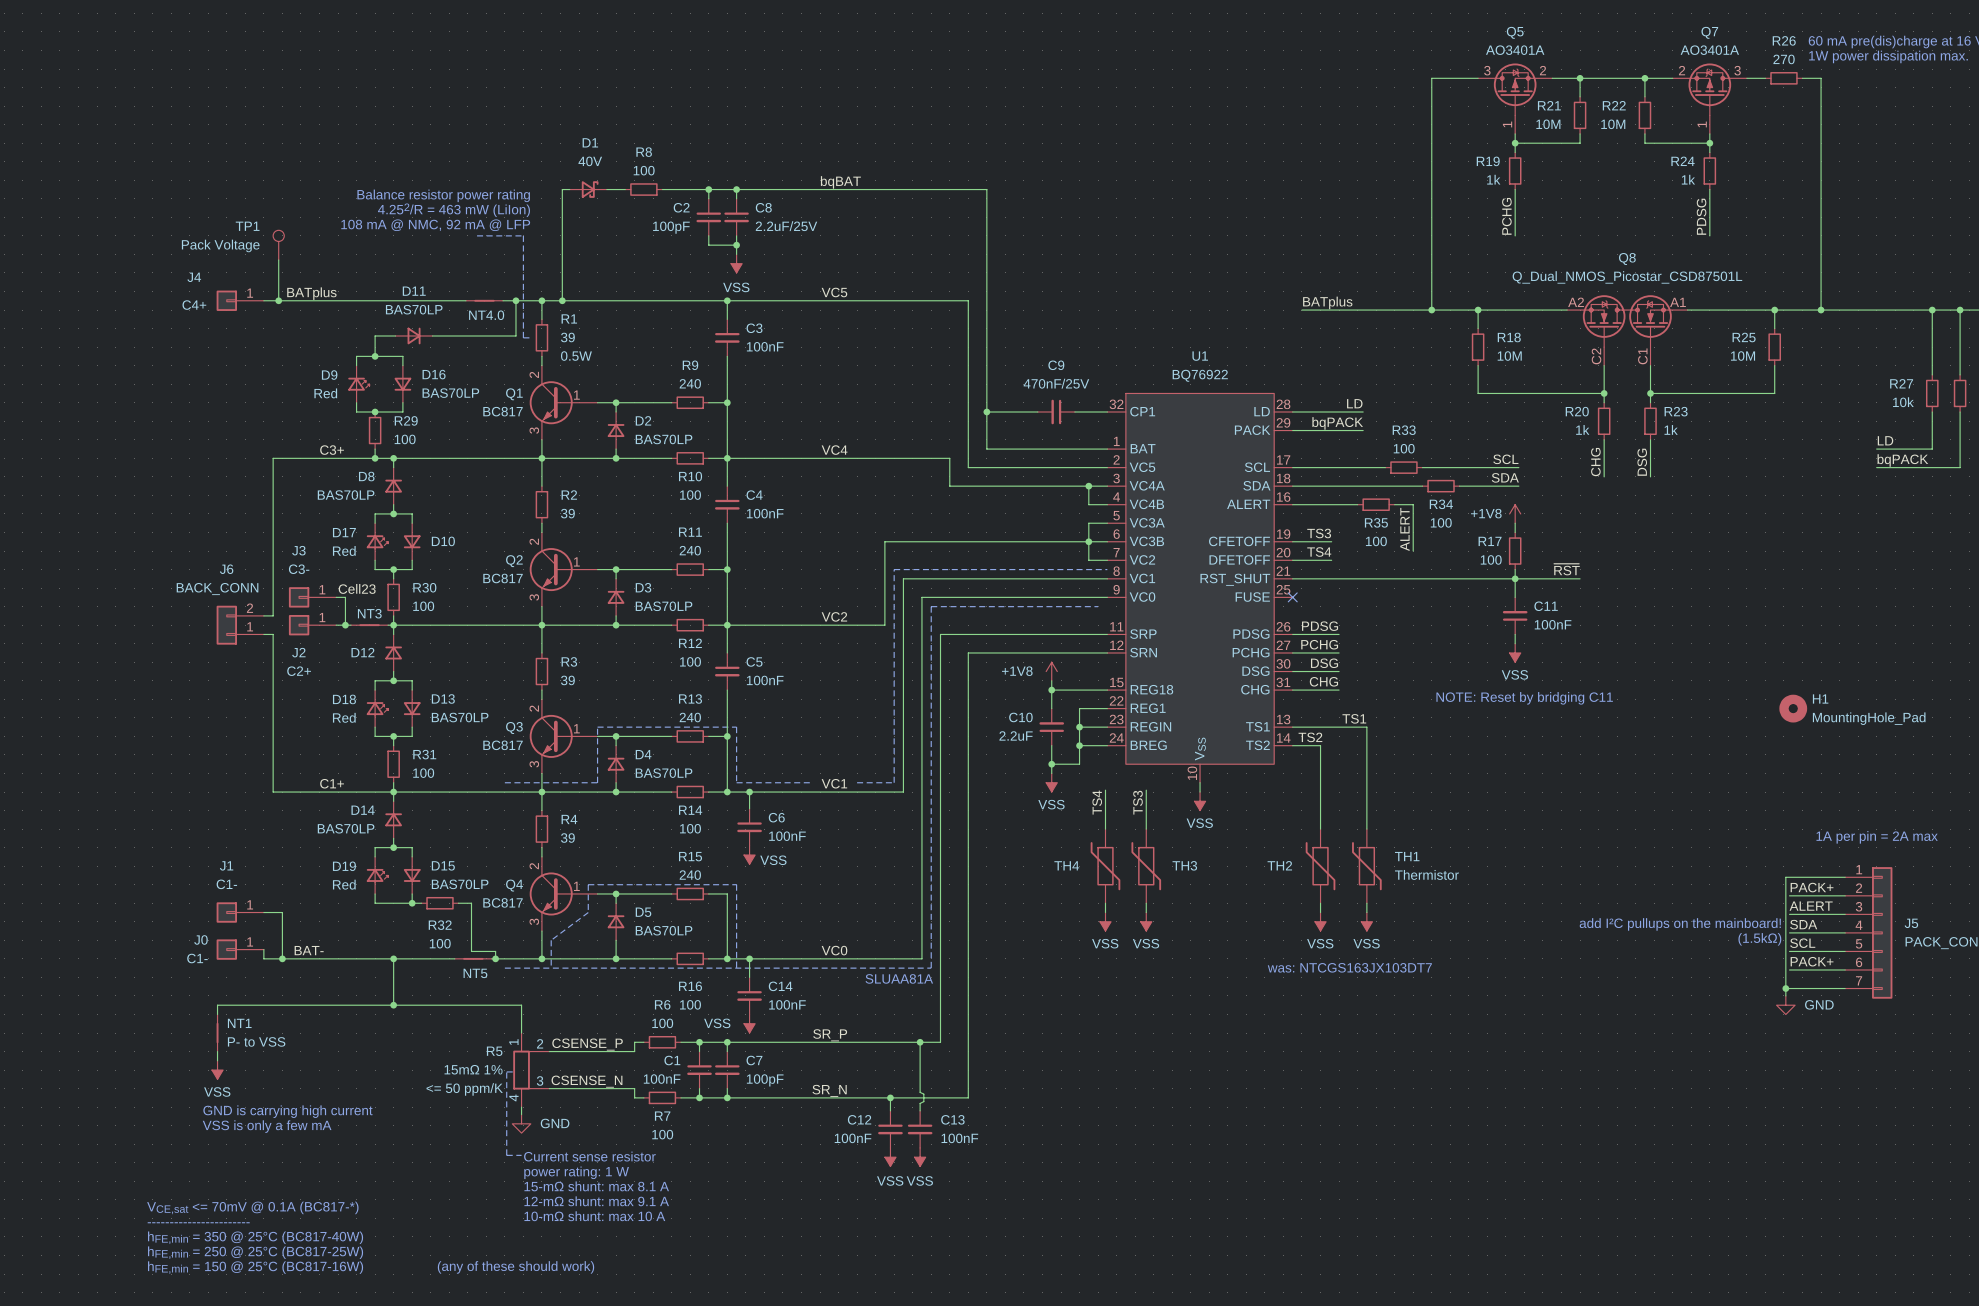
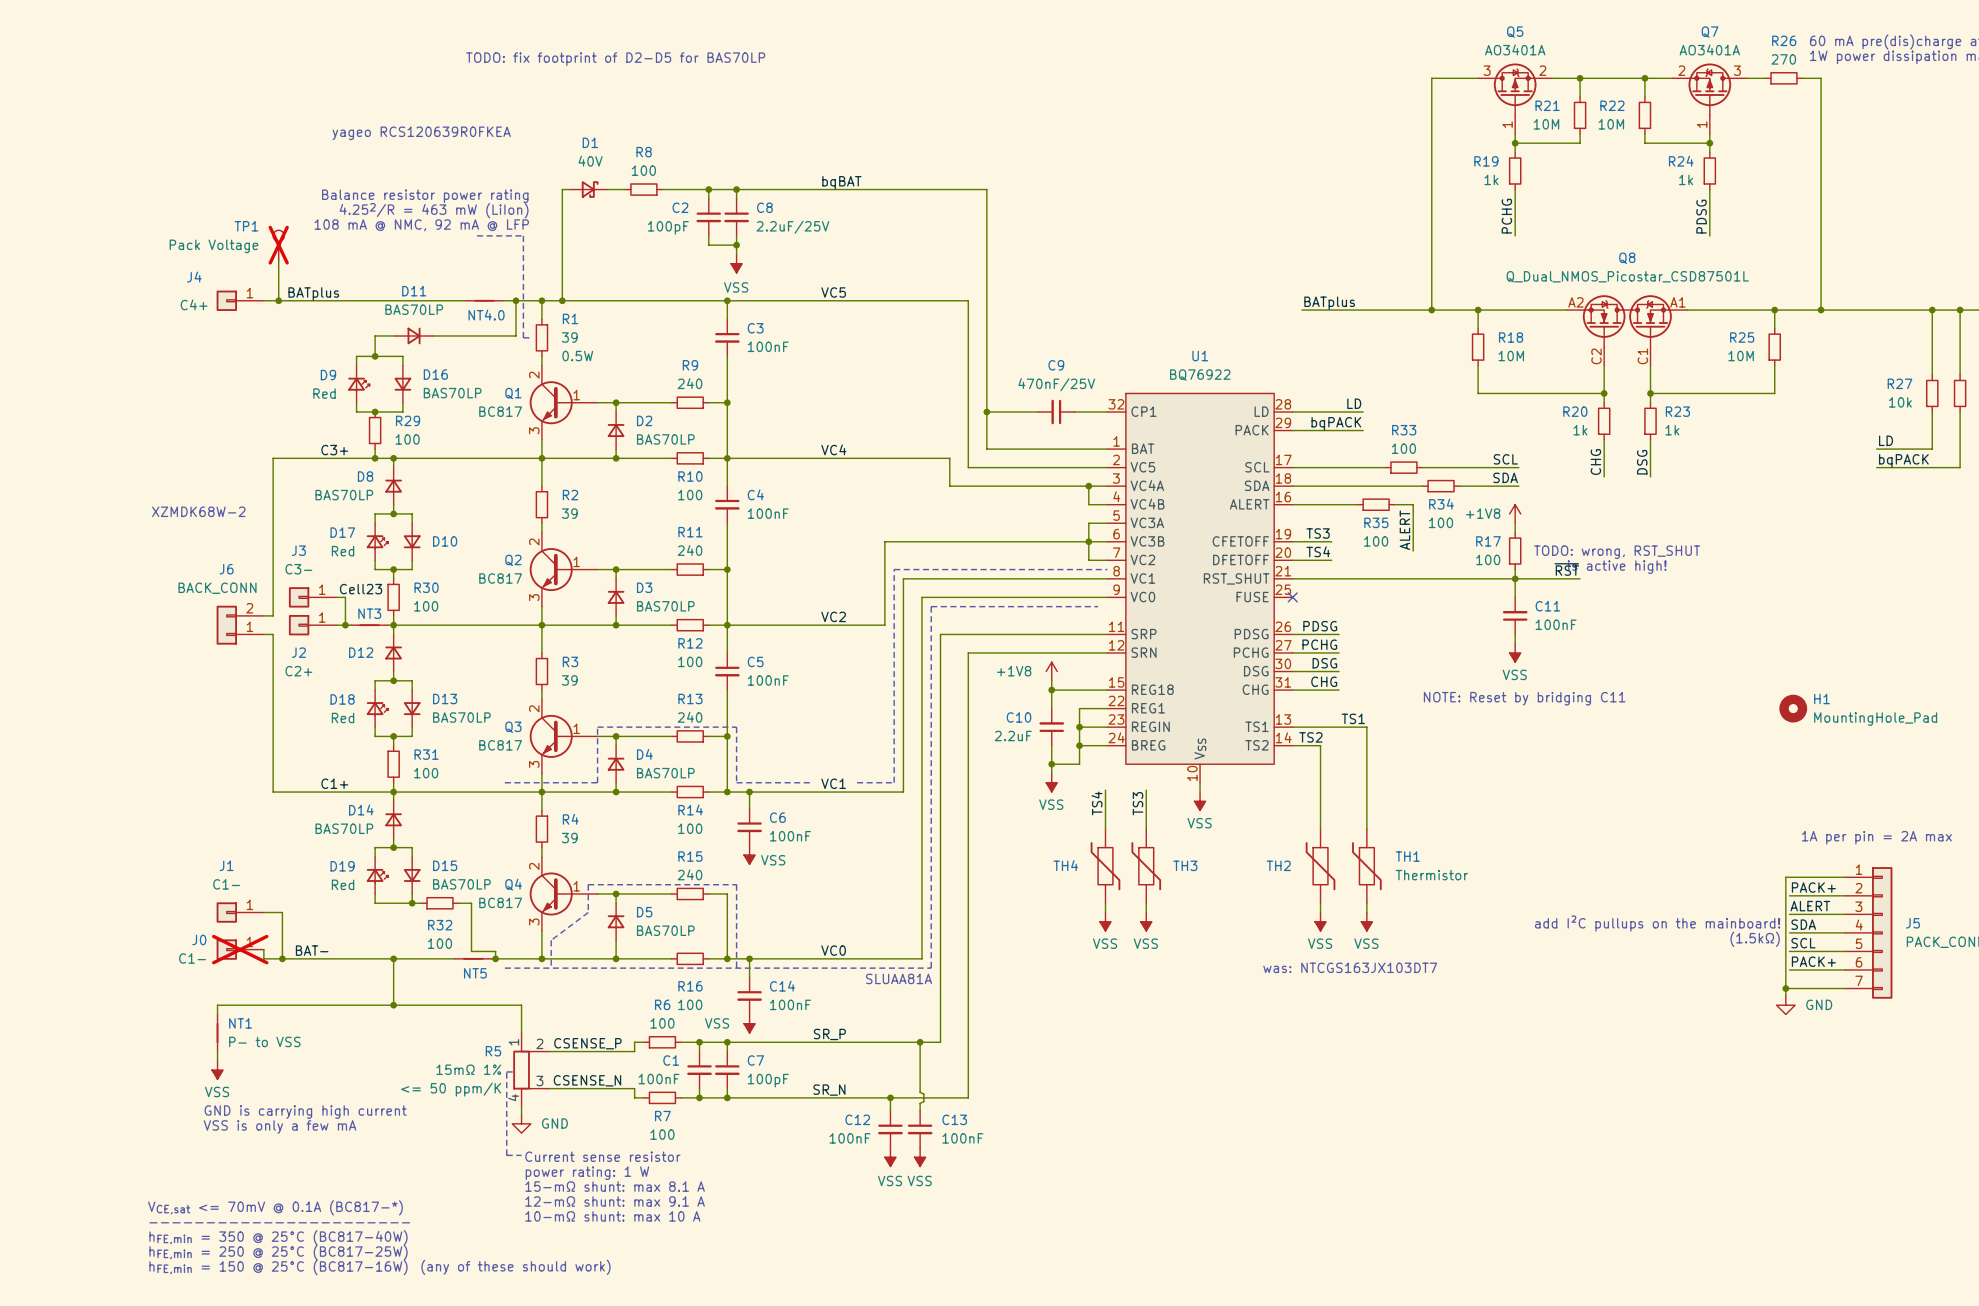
text: none -> TODO: fix footprint of D2-D5 for BAS70LP (615, 59)
text: none -> yageo RCS120639R0FKEA (421, 133)
TP1 do-not-place cross: none -> (278, 245)
text: none -> XZMDK68W-2 (198, 511)
text: none -> TODO: wrong, RST_SHUT (1617, 552)
text: none -> is active high! (1617, 567)
J0 do-not-place cross: none -> (240, 949)

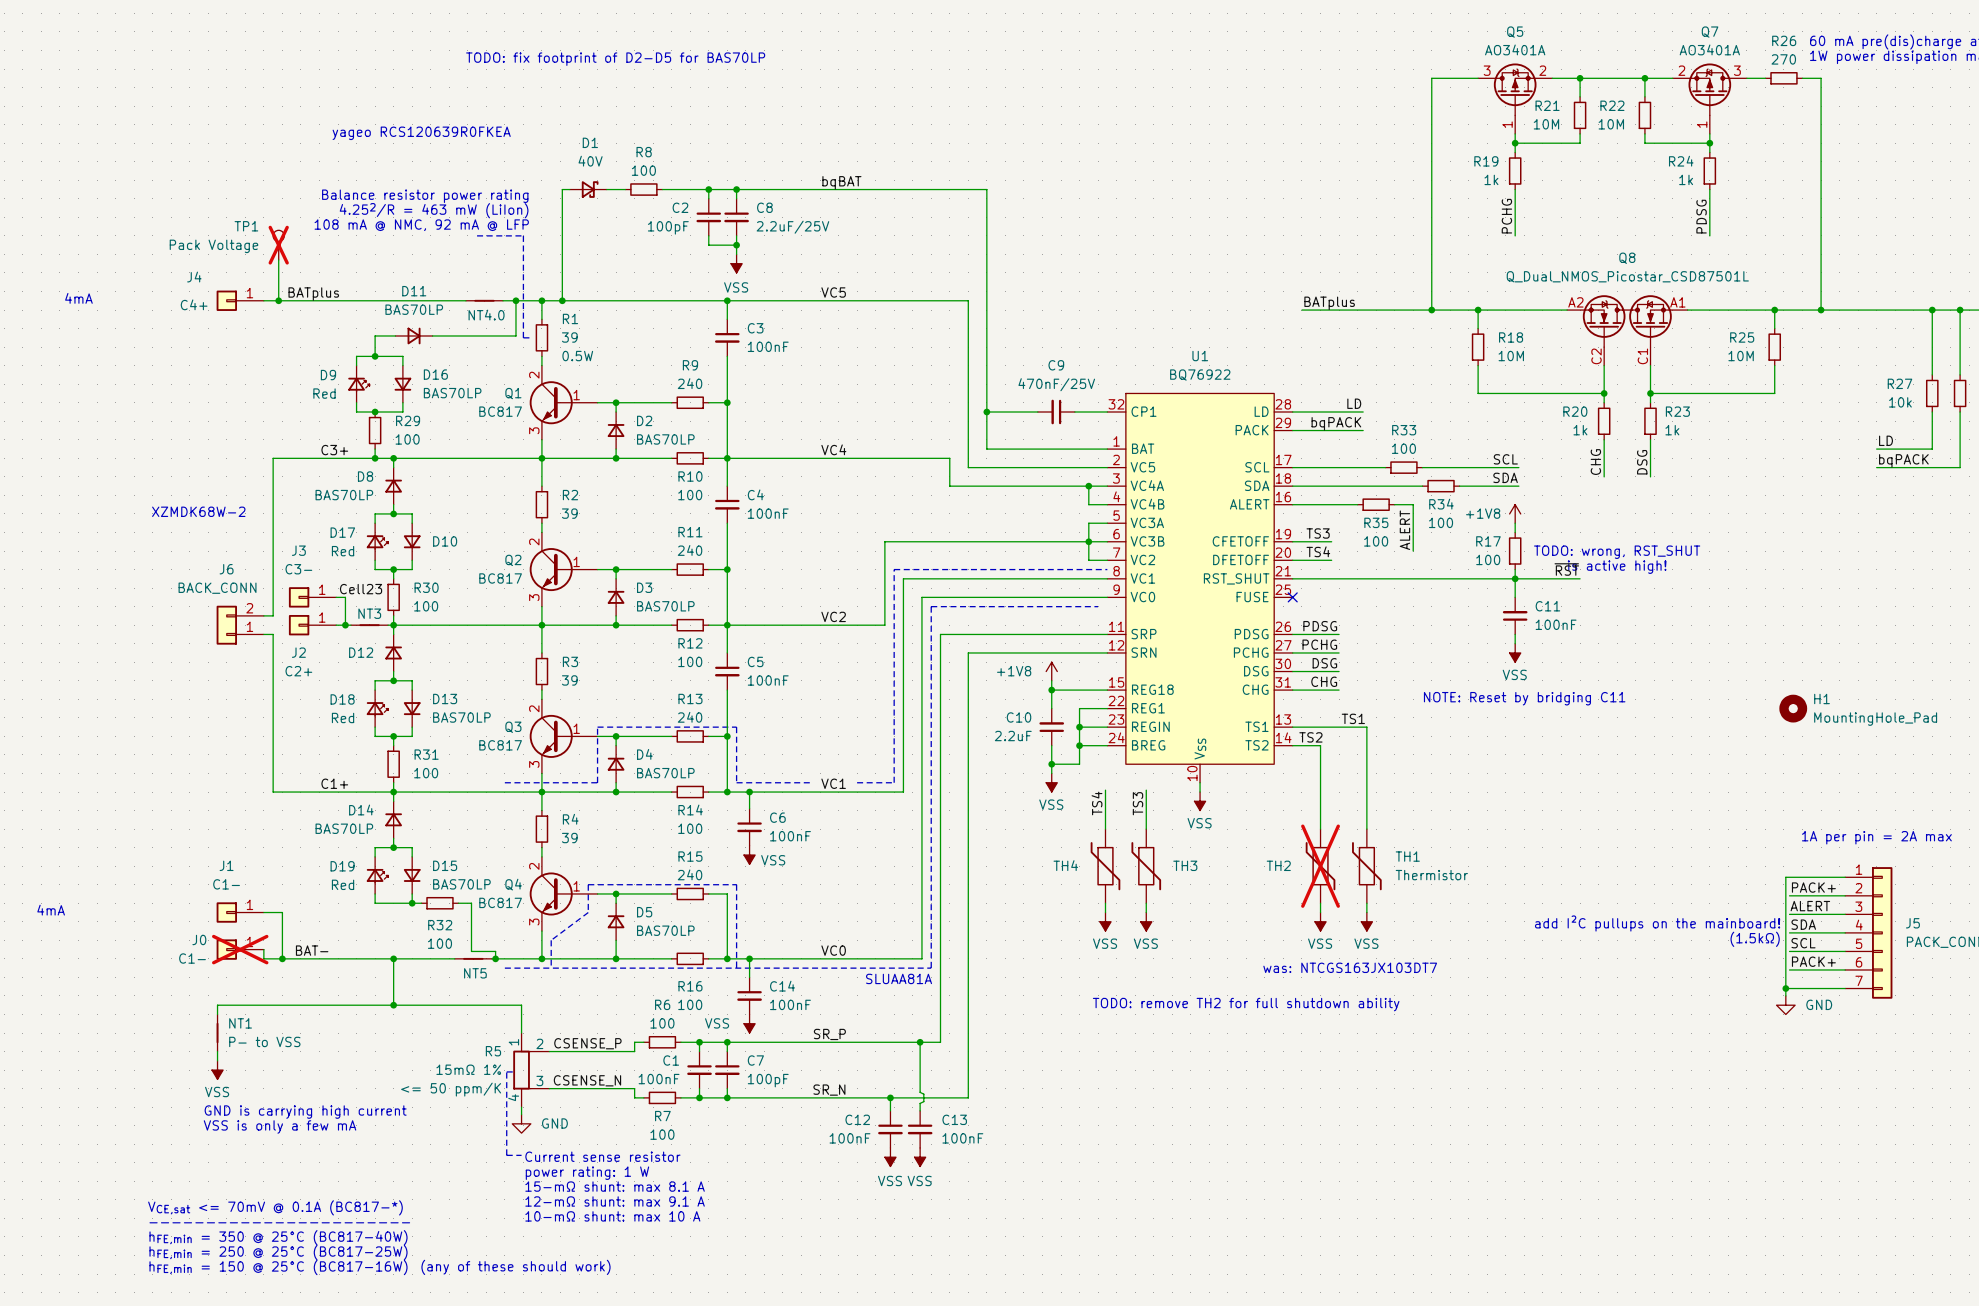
text: none -> 4mA (78, 298)
TH2 do-not-place cross: none -> (1320, 866)
text: none -> 4mA (51, 910)
text: none -> TODO: remove TH2 for full shutdown ability (1246, 1004)

